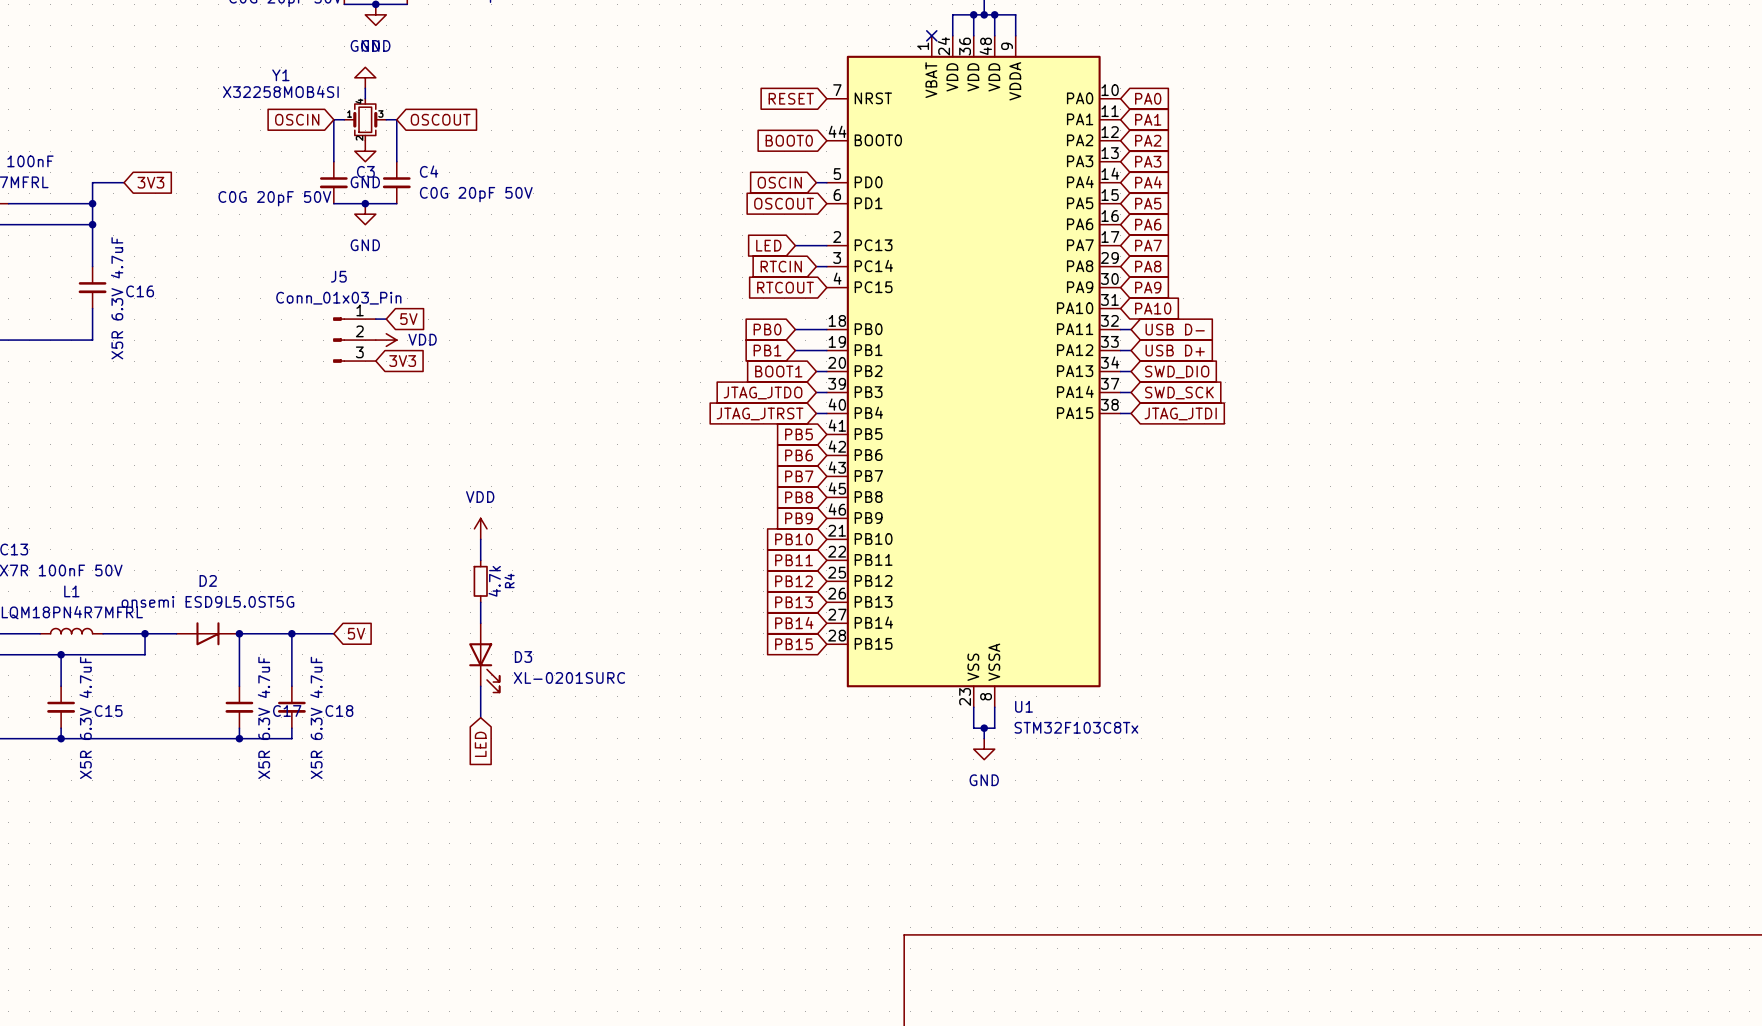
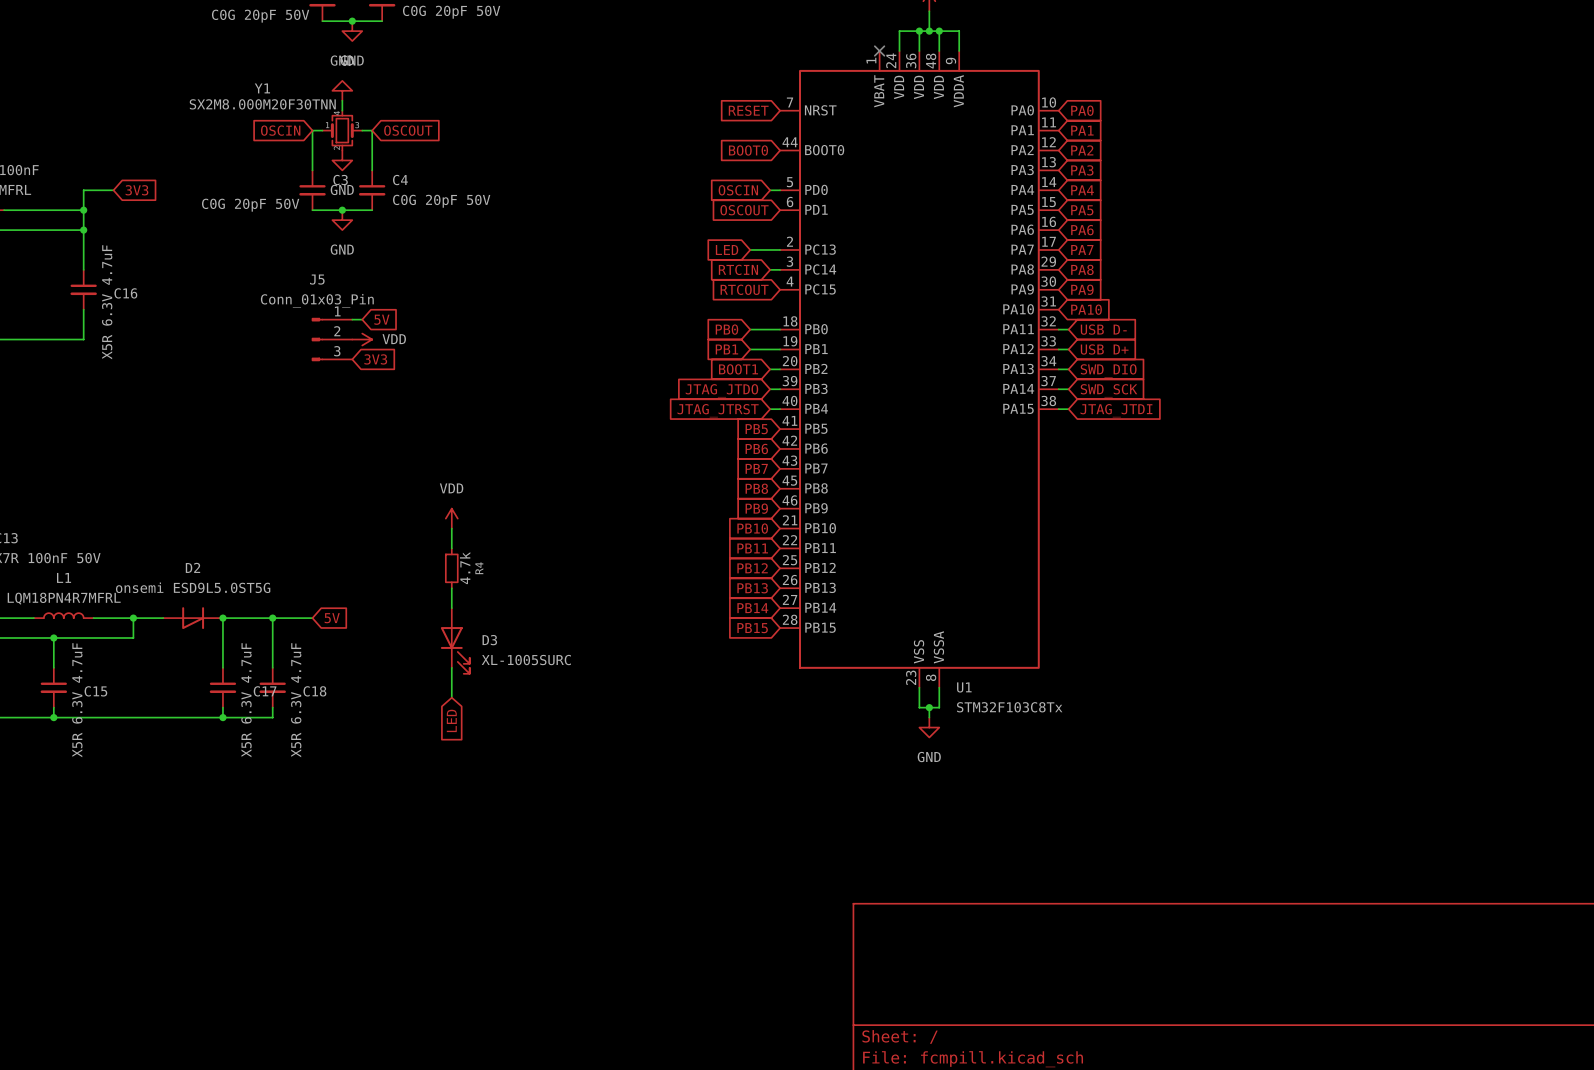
Y1 value: X32258MOB4SI (280, 91) -> SX2M8.000M20F30TNN (262, 104)
D3 value: XL-0201SURC (569, 677) -> XL-1005SURC (526, 660)

